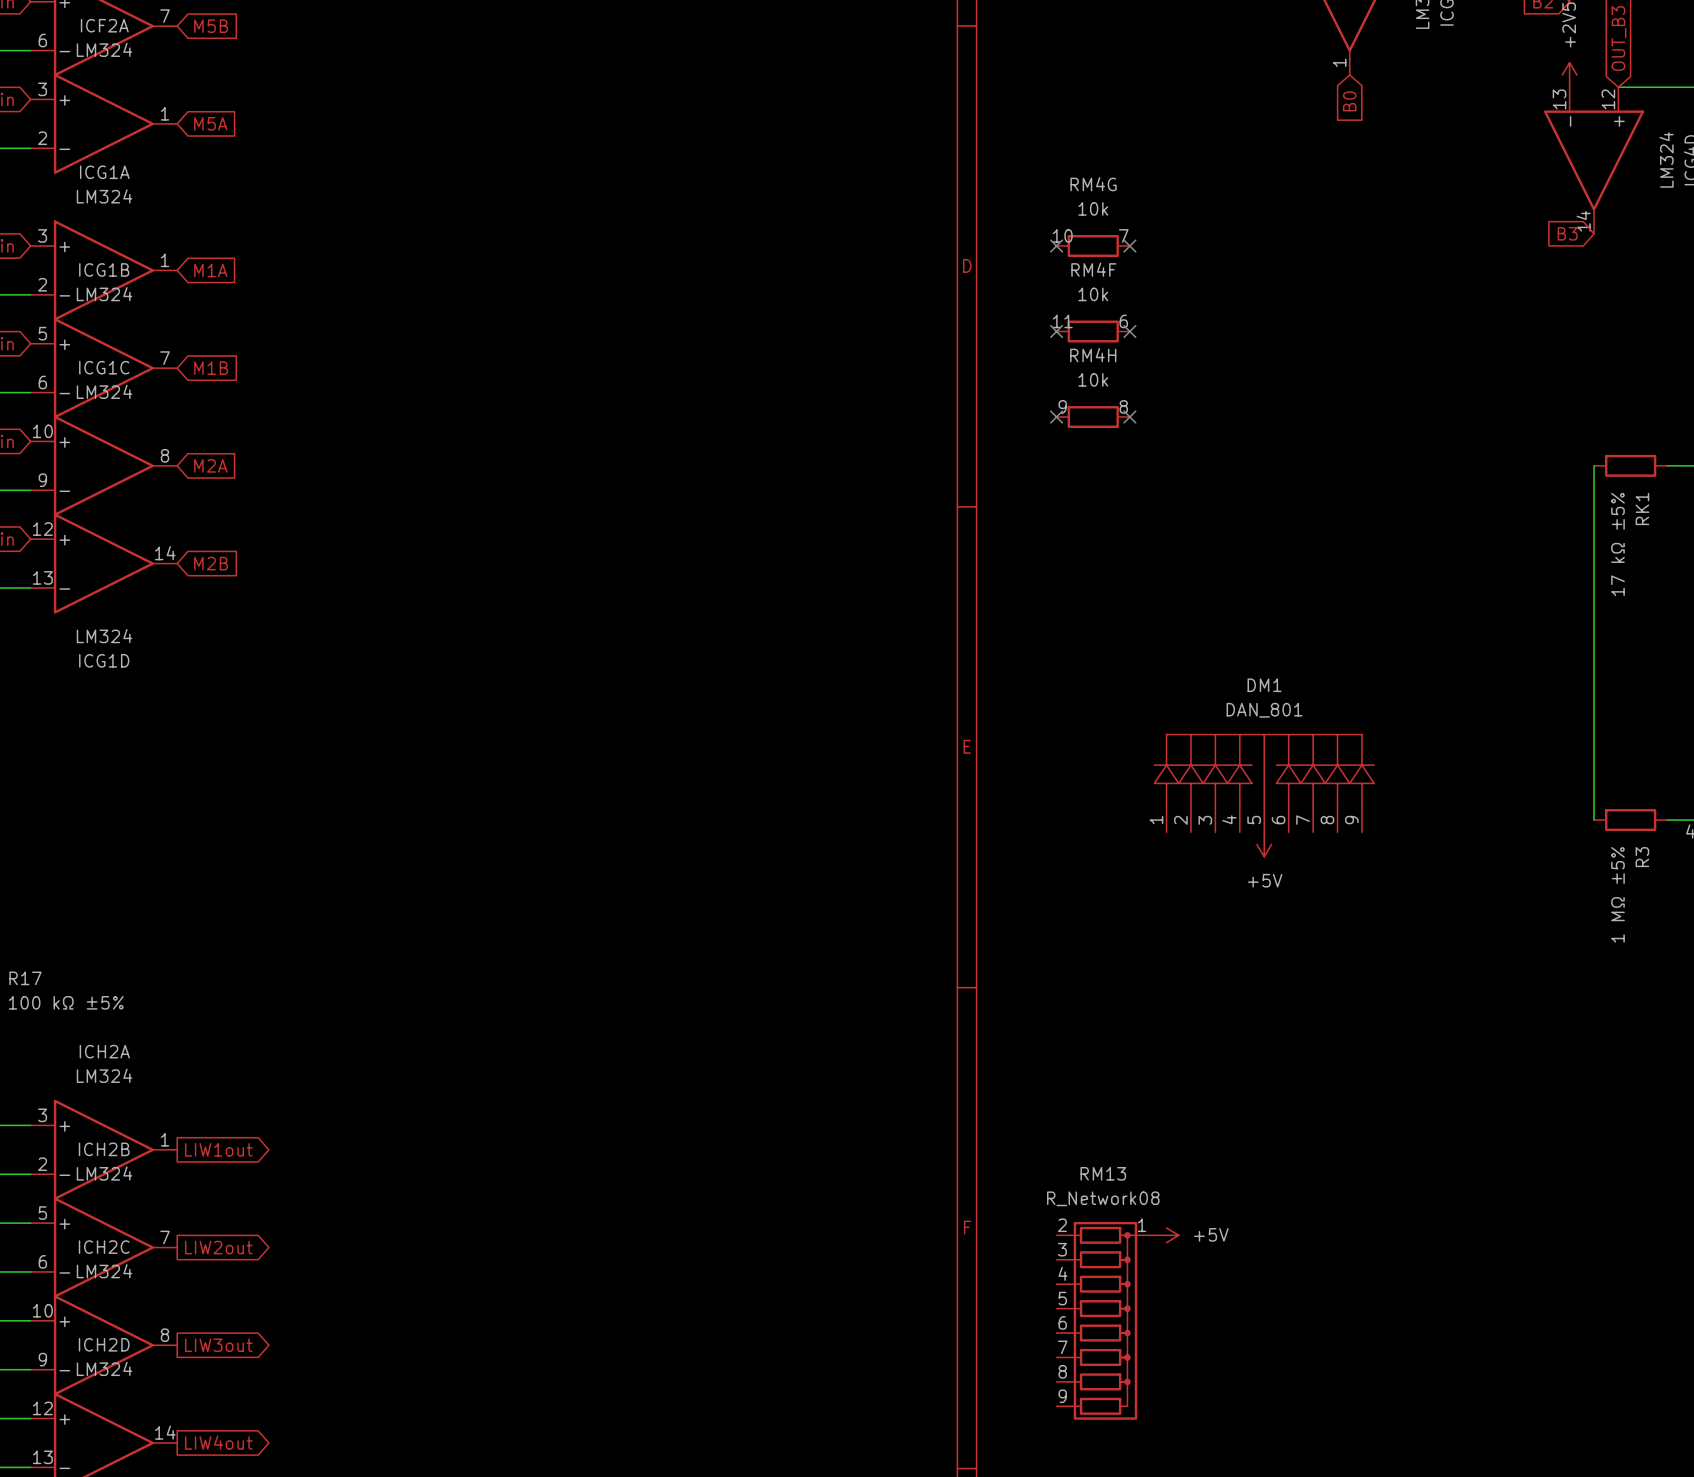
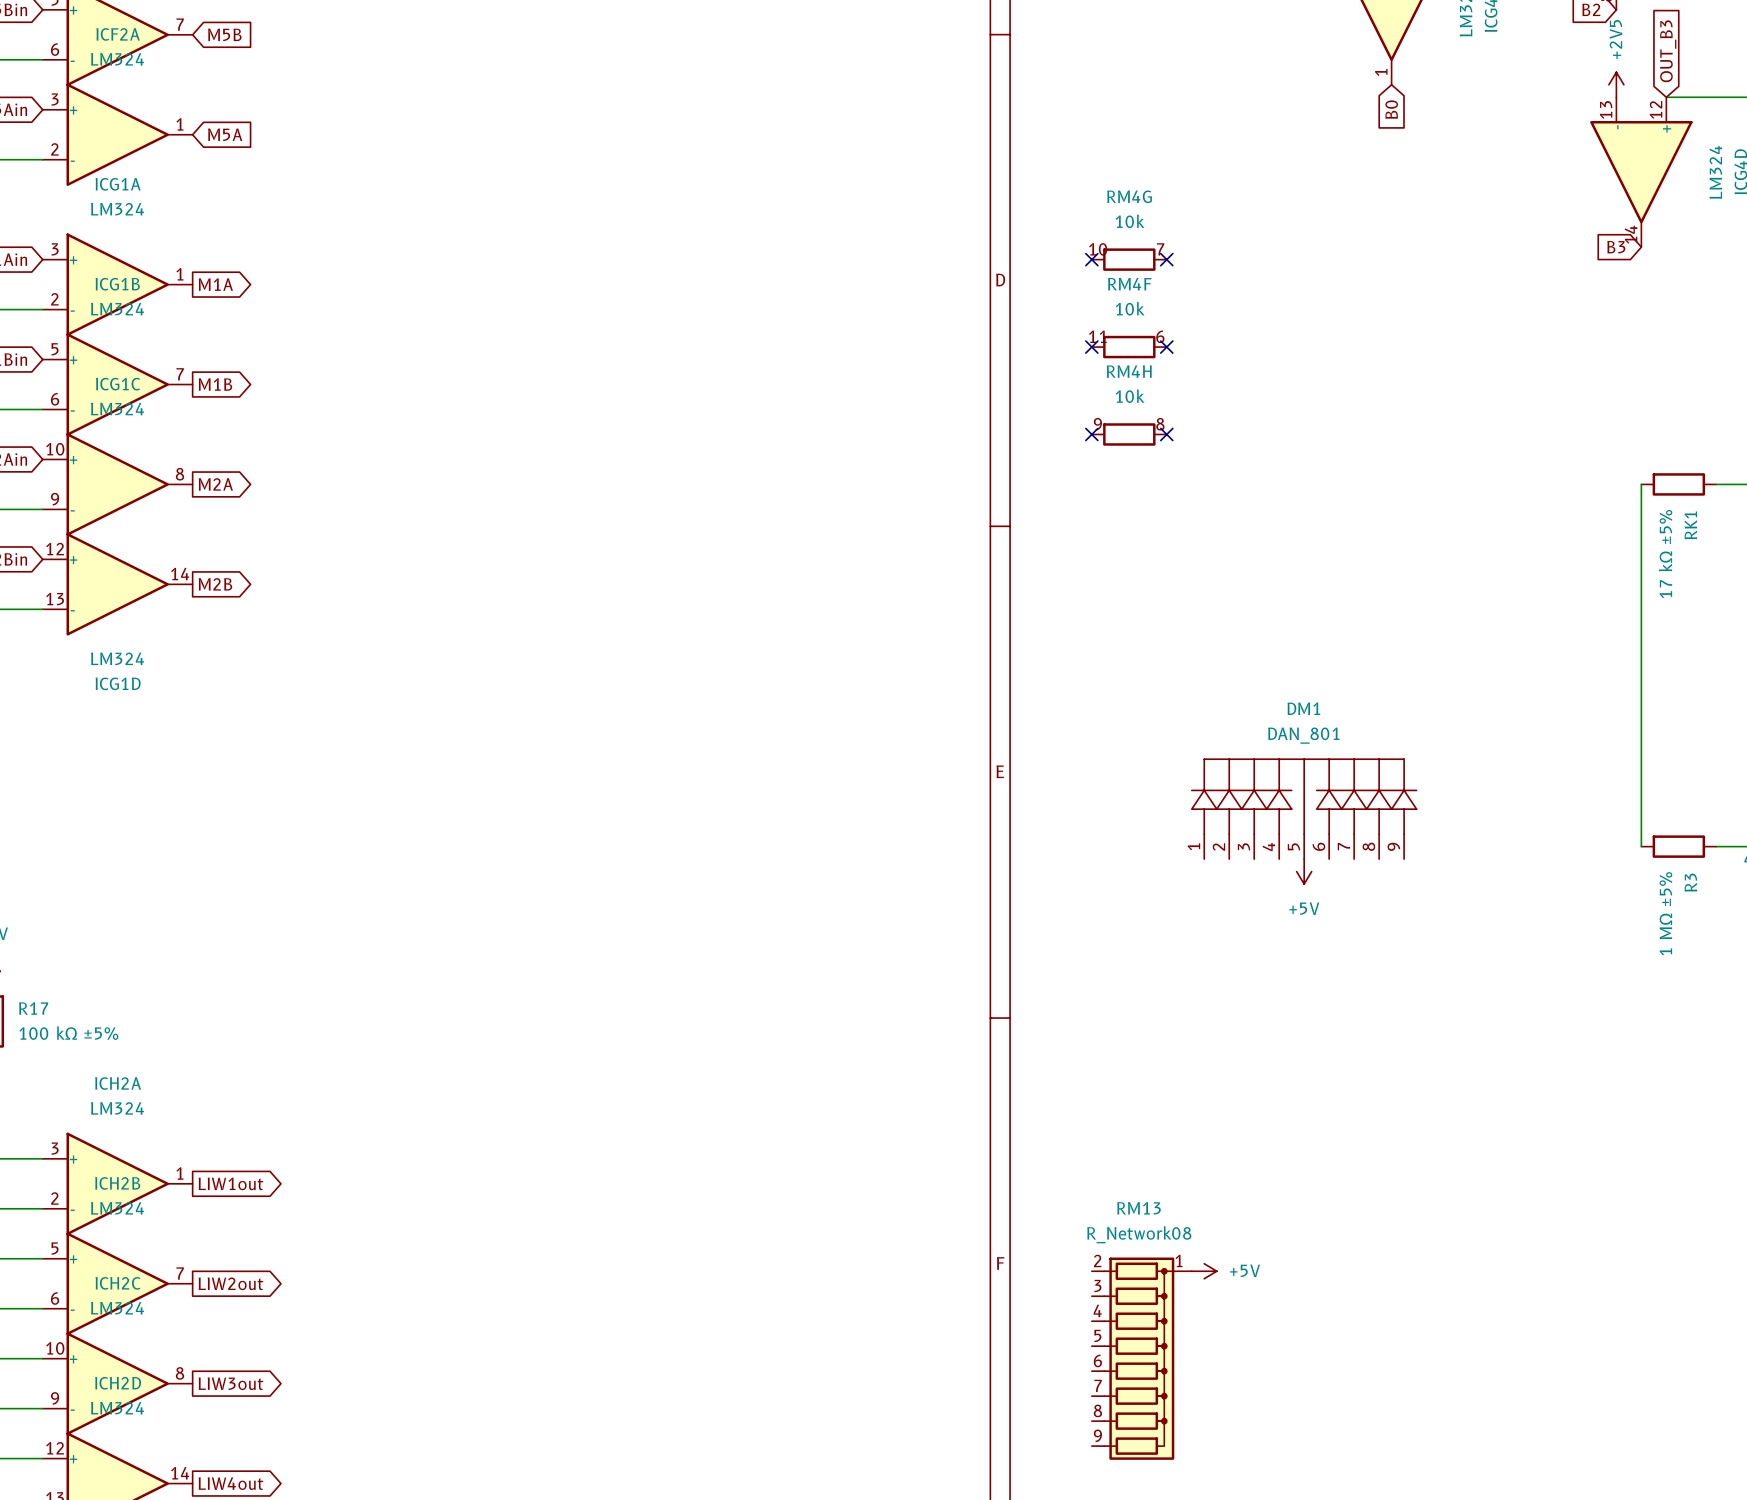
global label shape: input (210, 270) -> output (215, 284)
global label shape: input (211, 368) -> output (215, 384)
global label shape: input (210, 465) -> output (215, 484)
global label shape: input (211, 563) -> output (215, 584)

